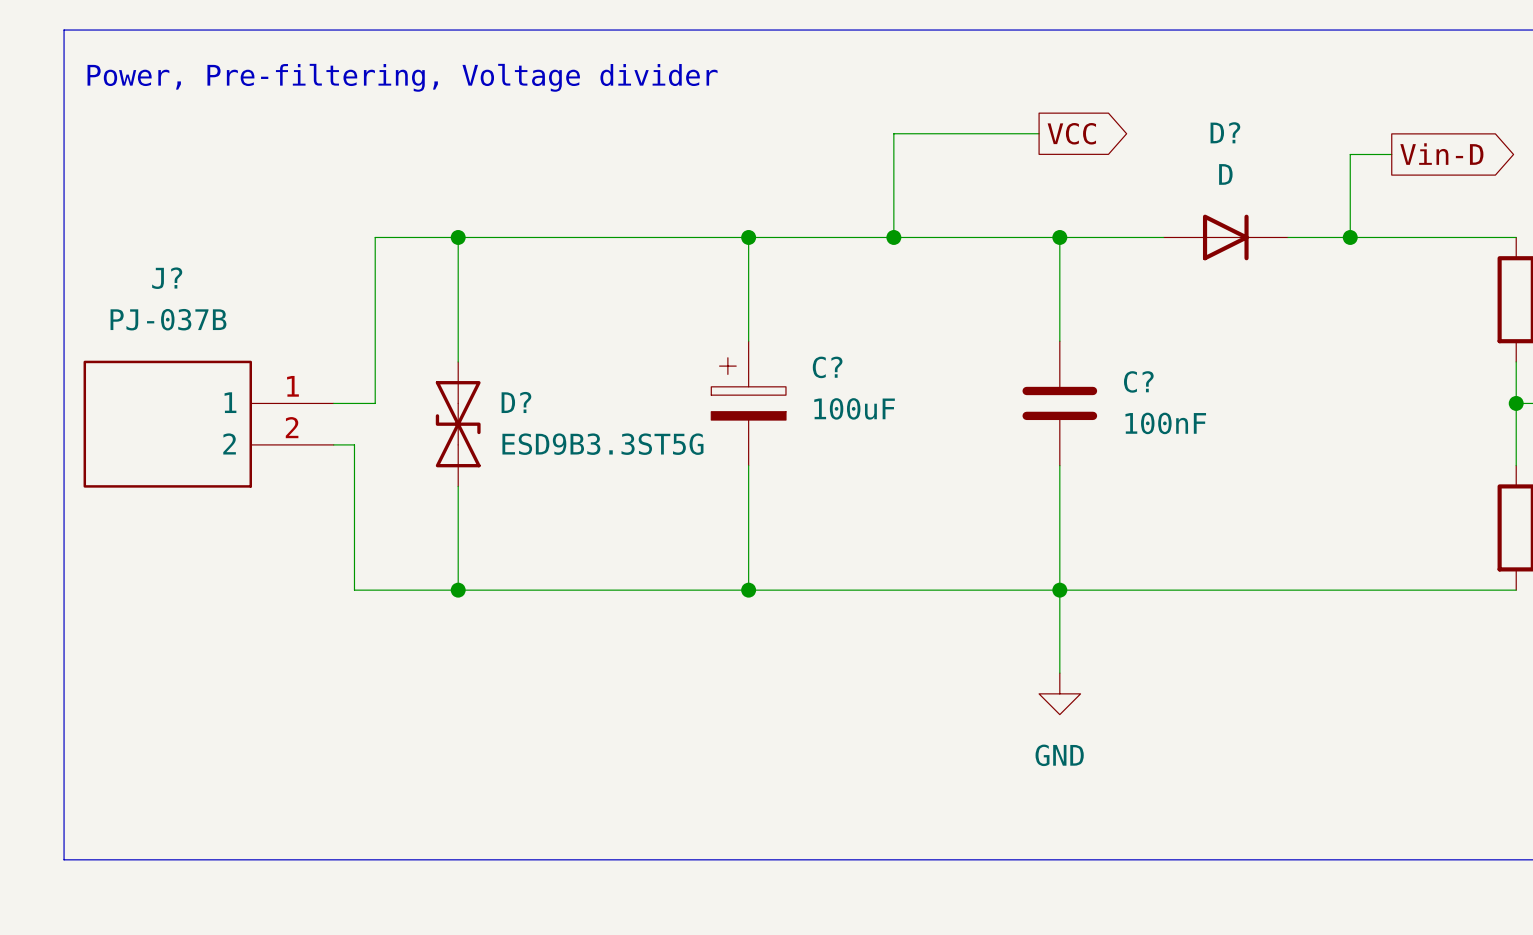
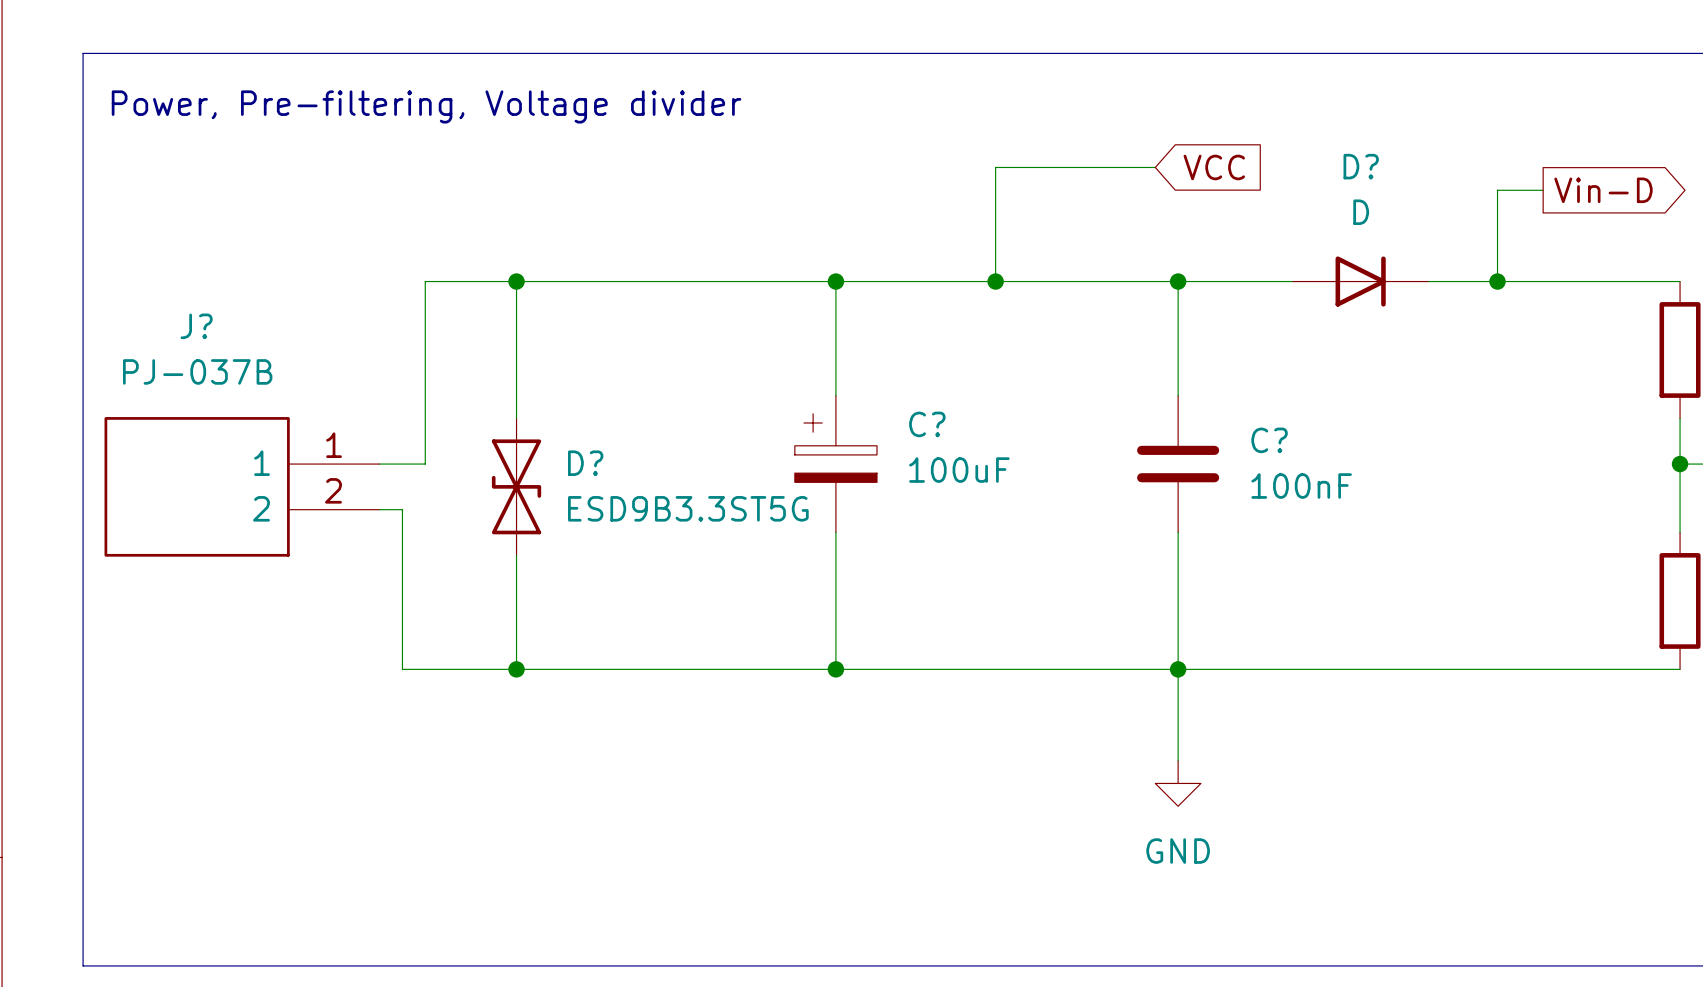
global label shape: output (1071, 133) -> input (1214, 167)

